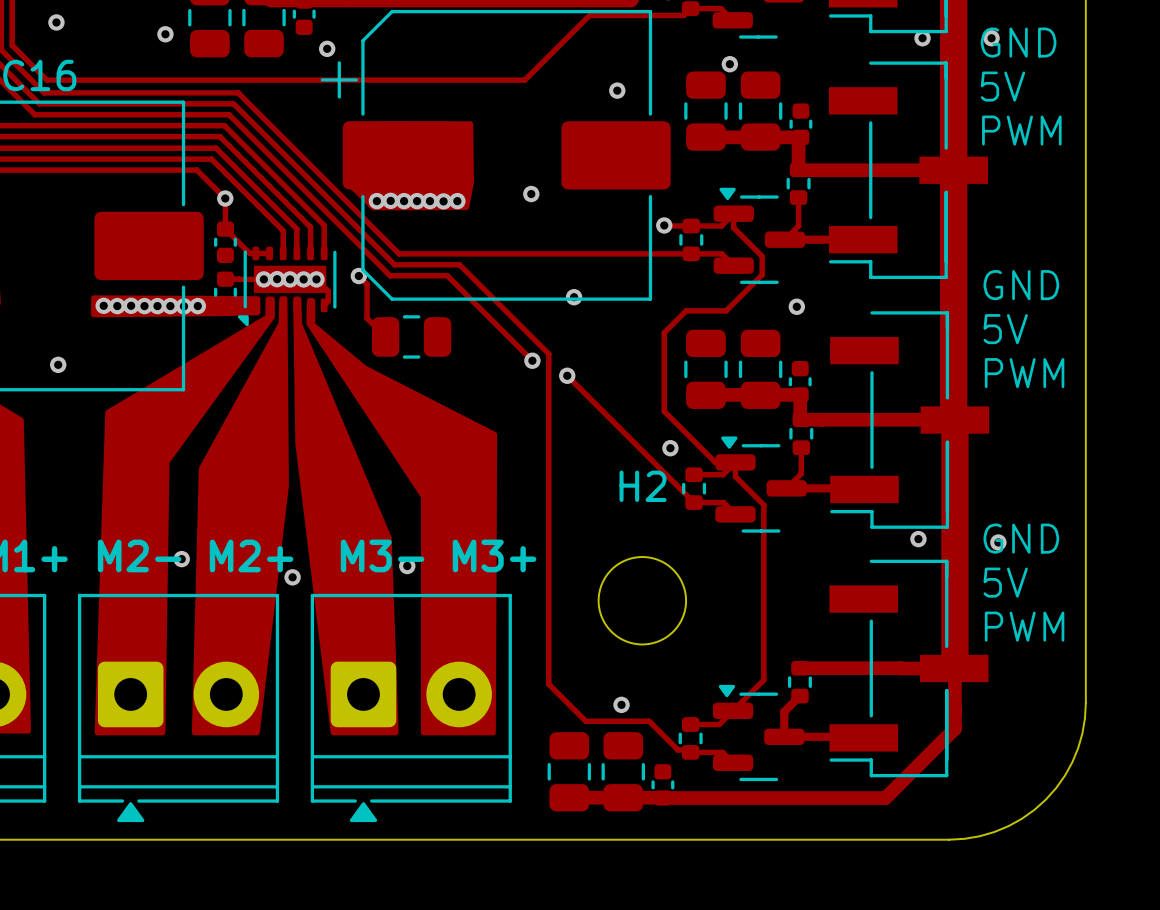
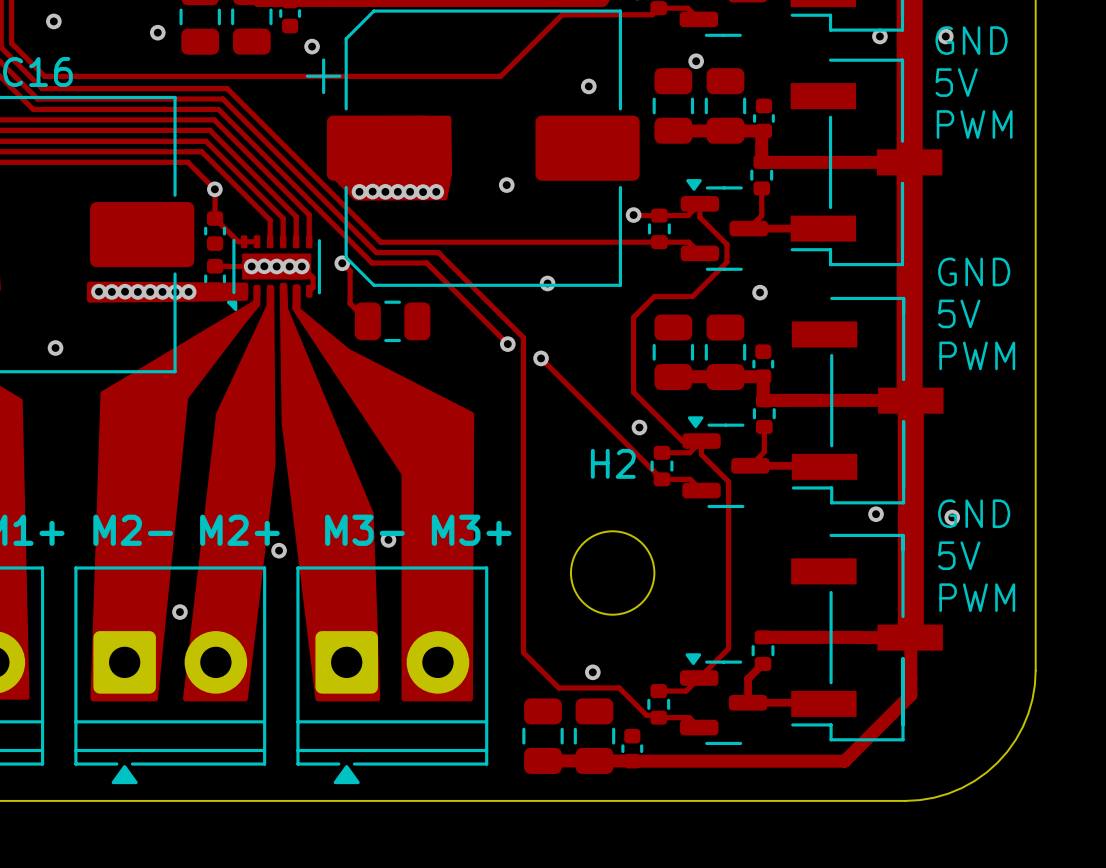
drawing shape: [94, 296, 275, 736] -> [90, 284, 261, 702]
drawing shape: [191, 296, 289, 736] -> [183, 285, 276, 702]
via position: (181, 559) -> (179, 612)

